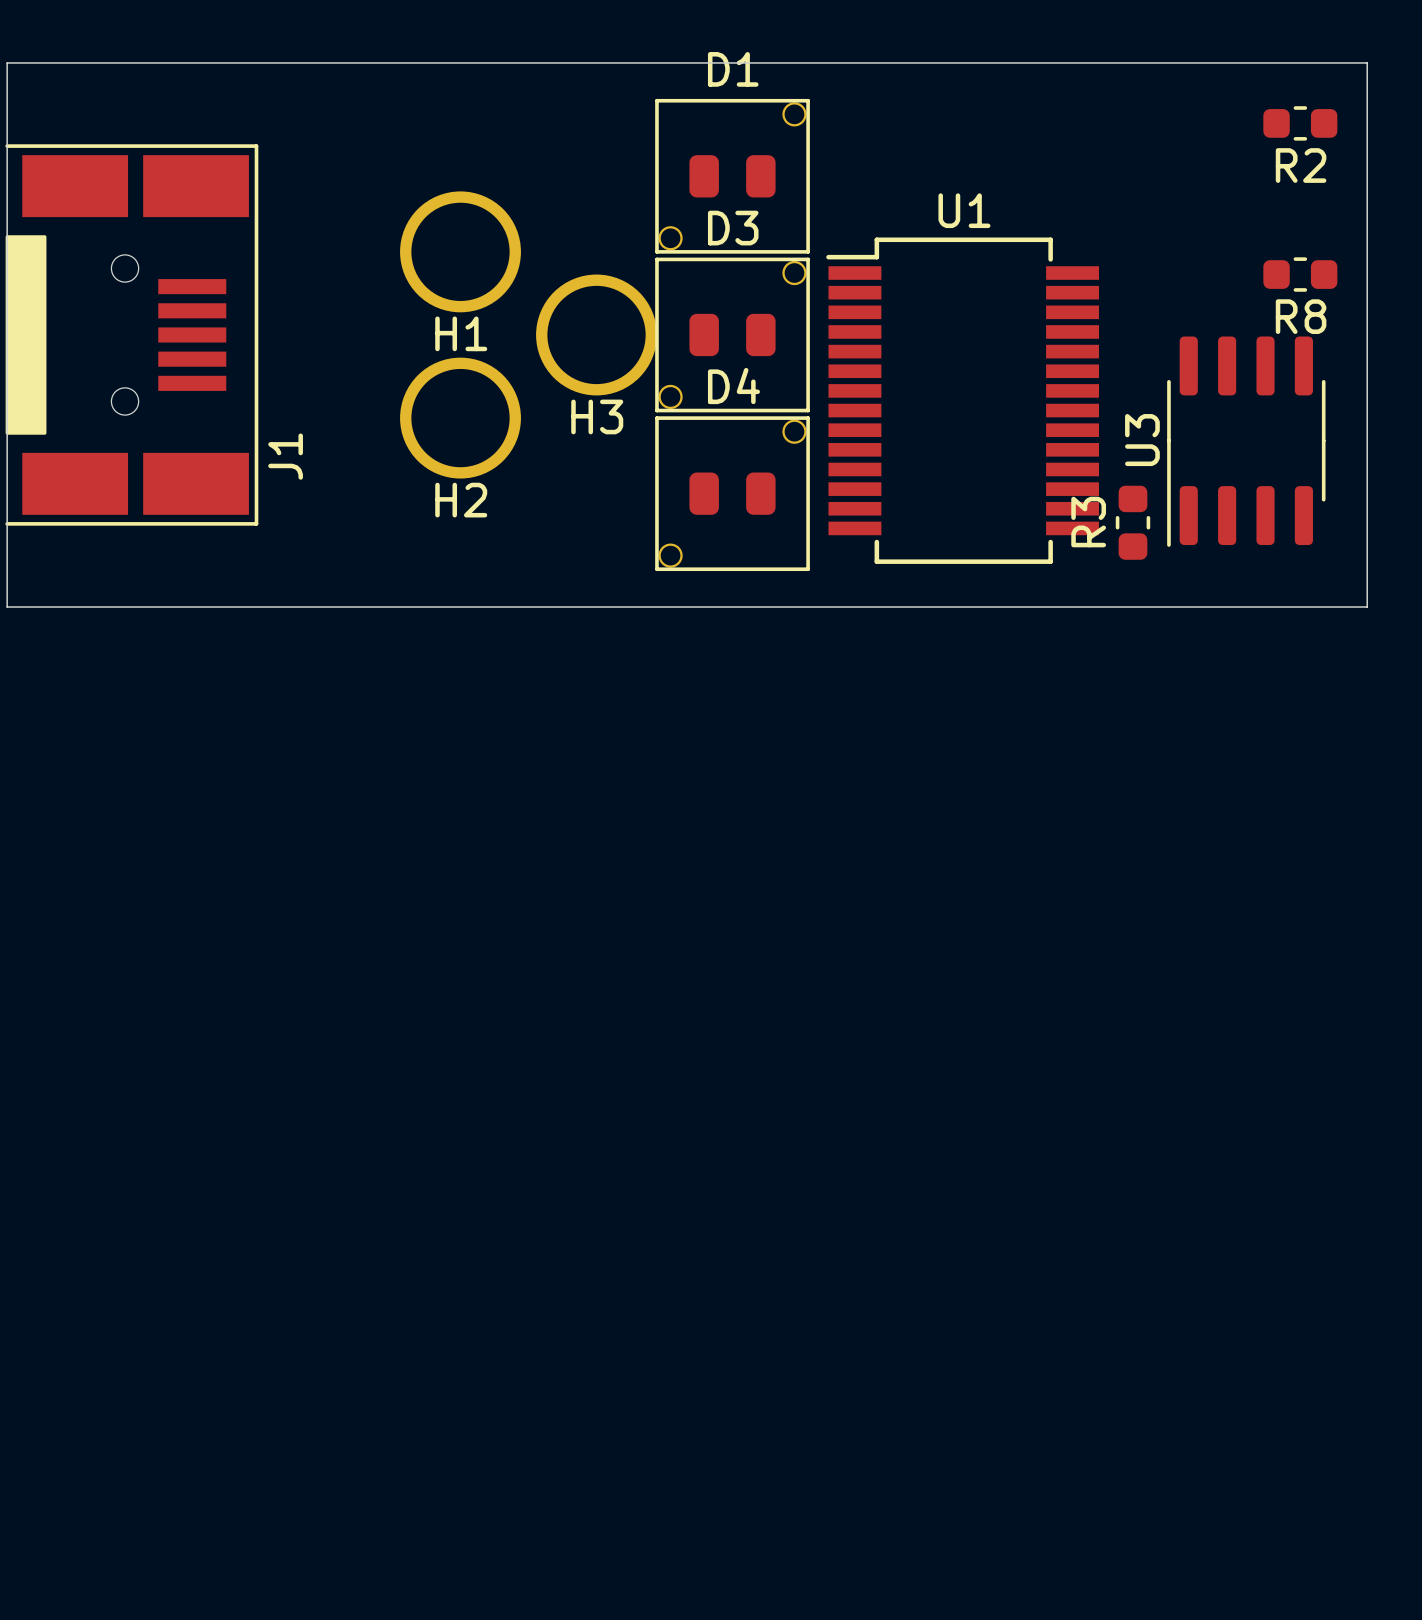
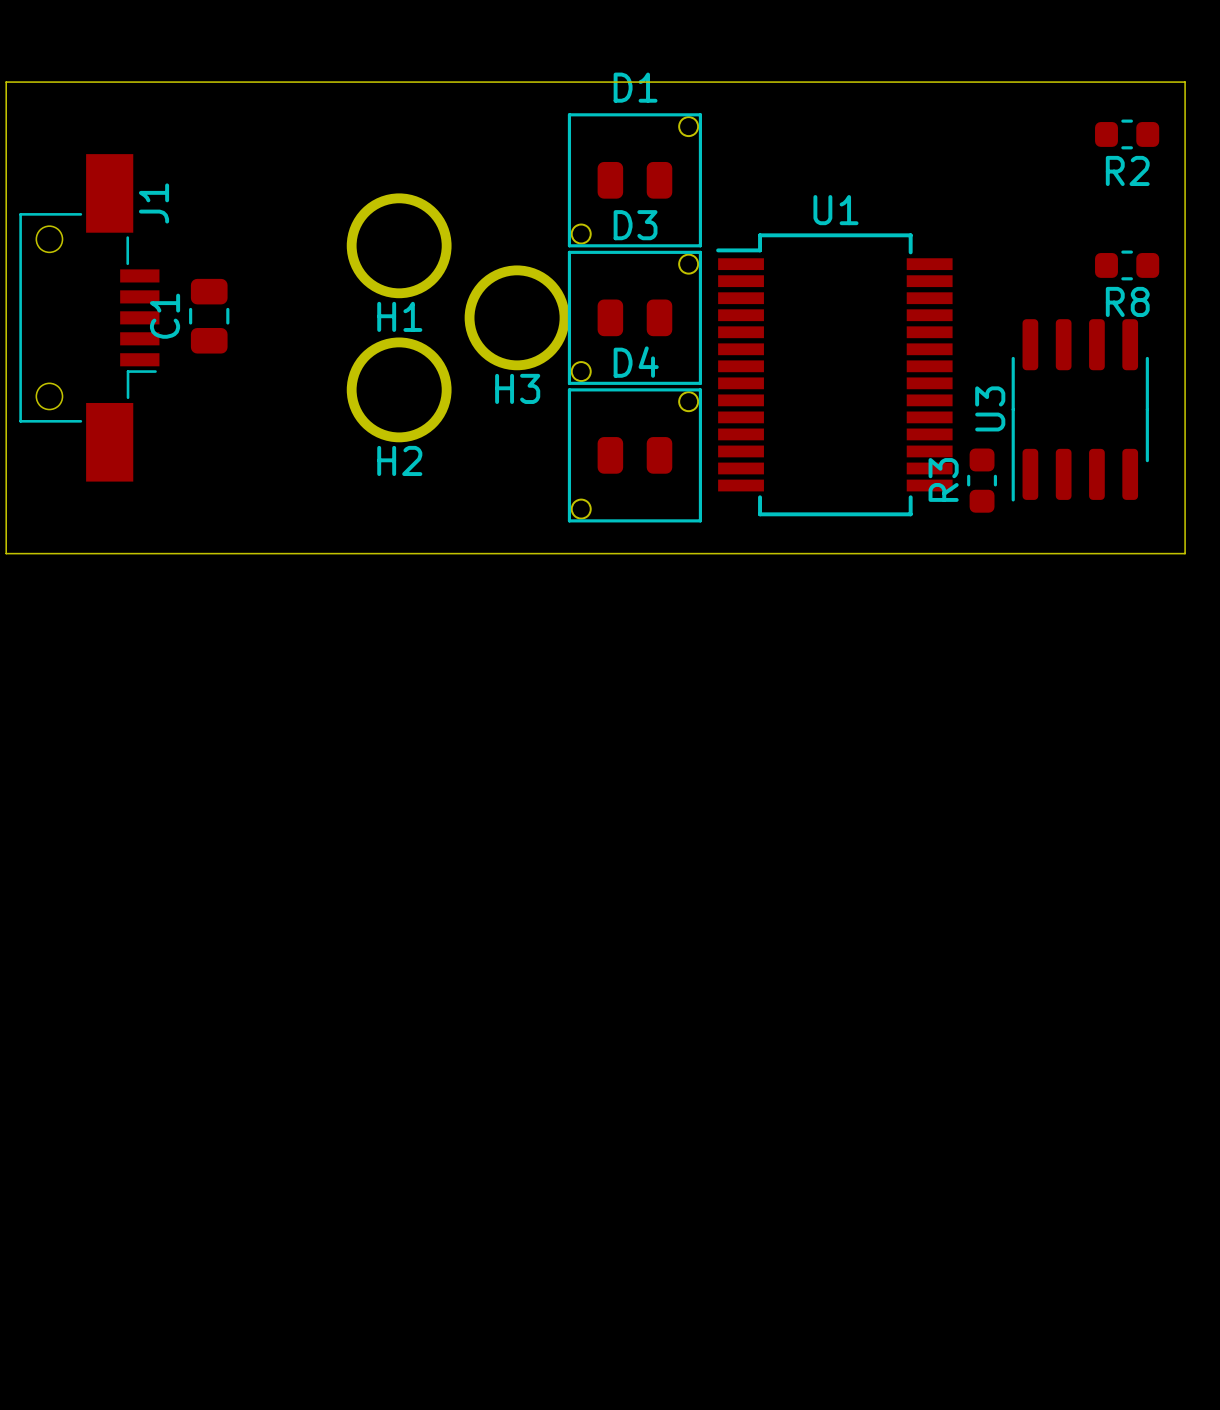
J1 footprint: [5, 144, 259, 526] -> [19, 154, 160, 482]
C1: none -> (209, 316)
J1 name position: J1 (285, 456) -> J1 (154, 203)

